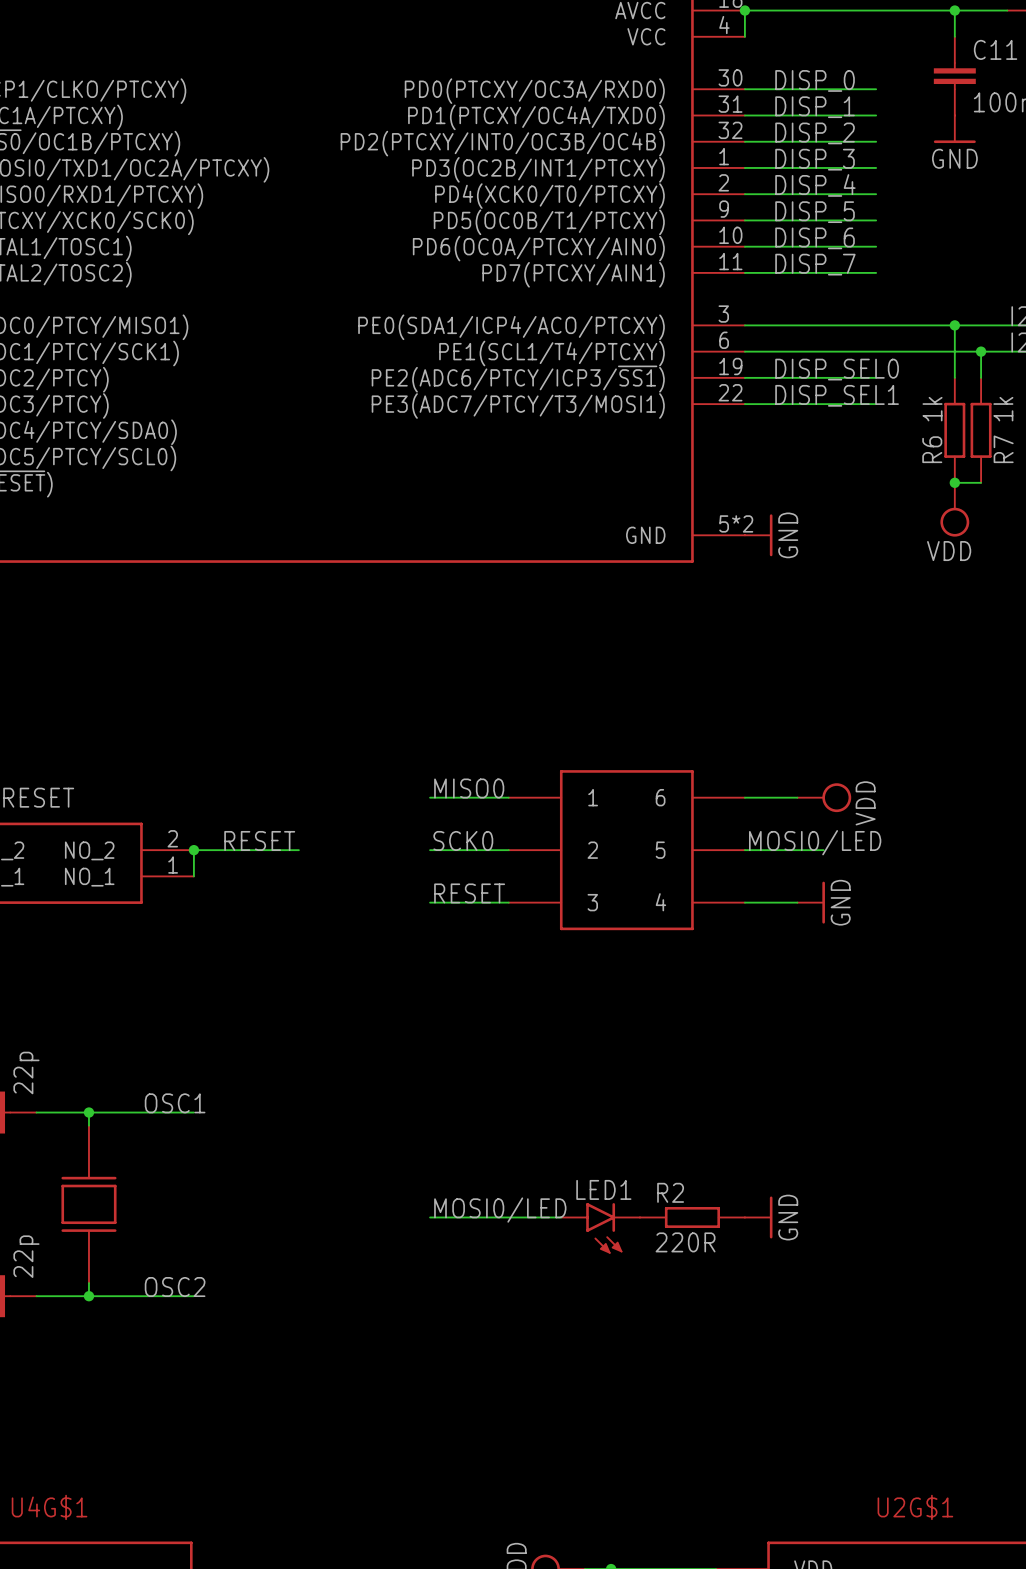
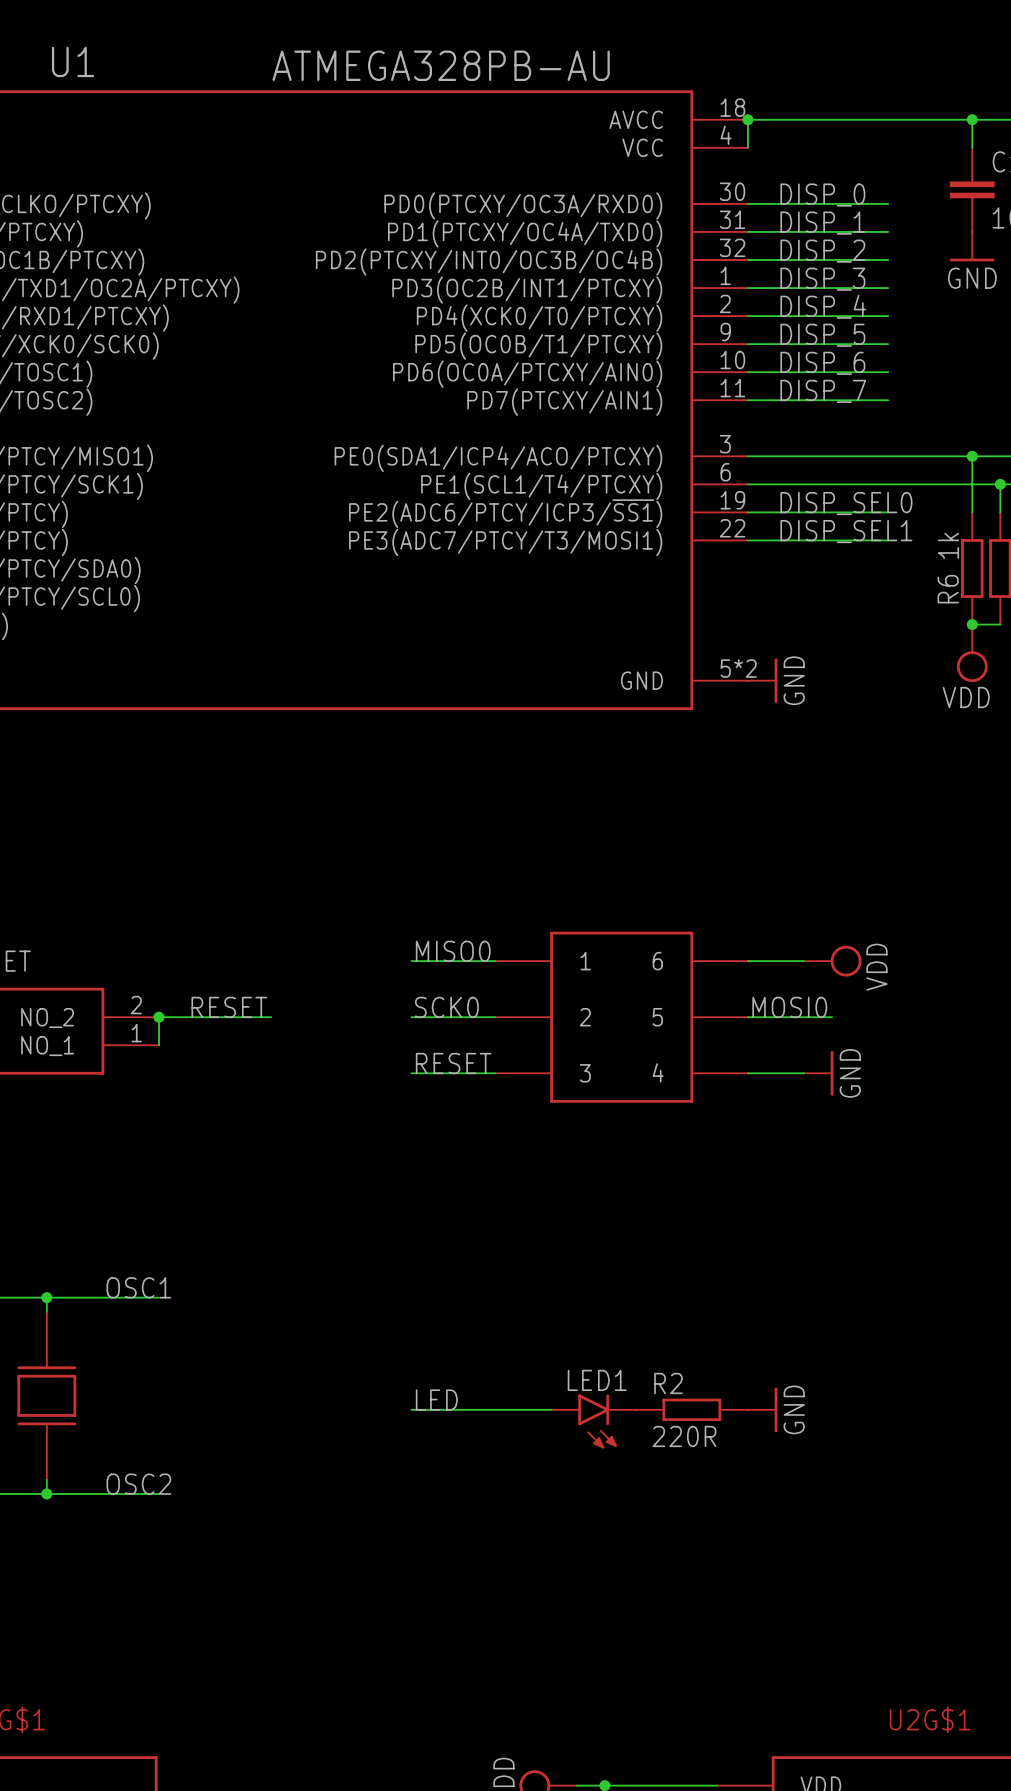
label: MOSI0/LED (815, 842) -> MOSI0 (789, 1007)
label: MOSI0/LED (500, 1210) -> LED (436, 1400)

